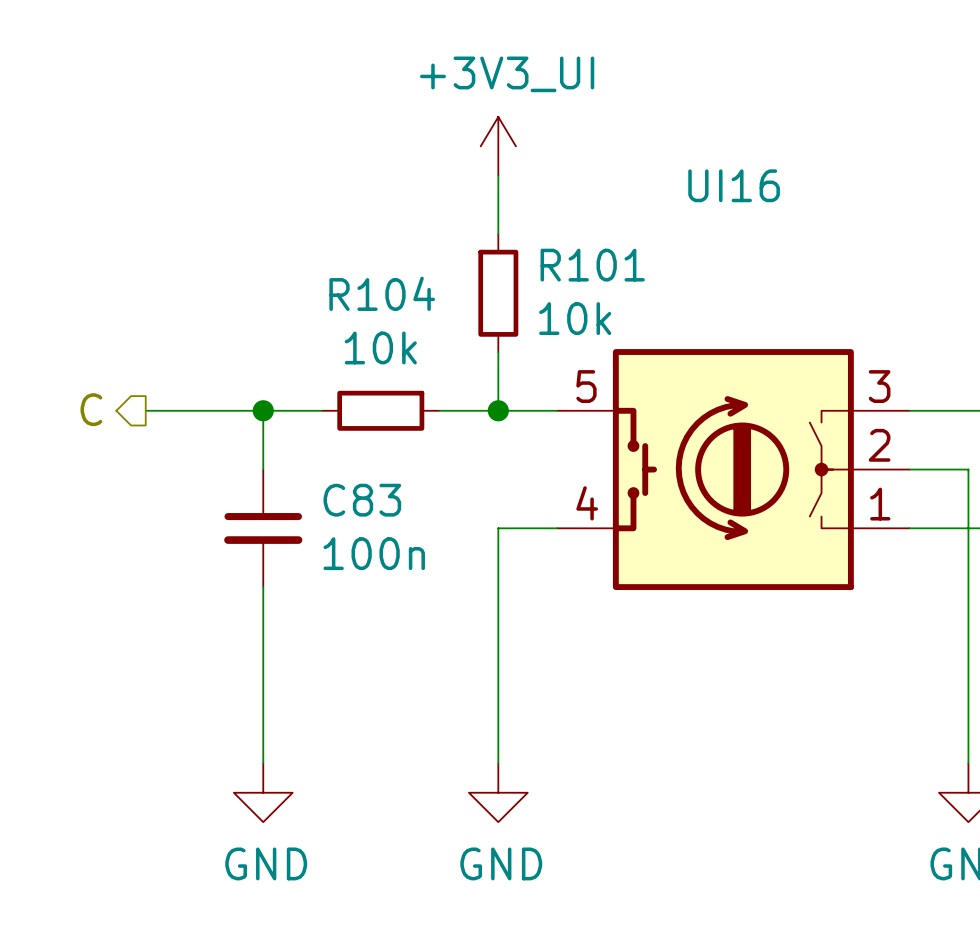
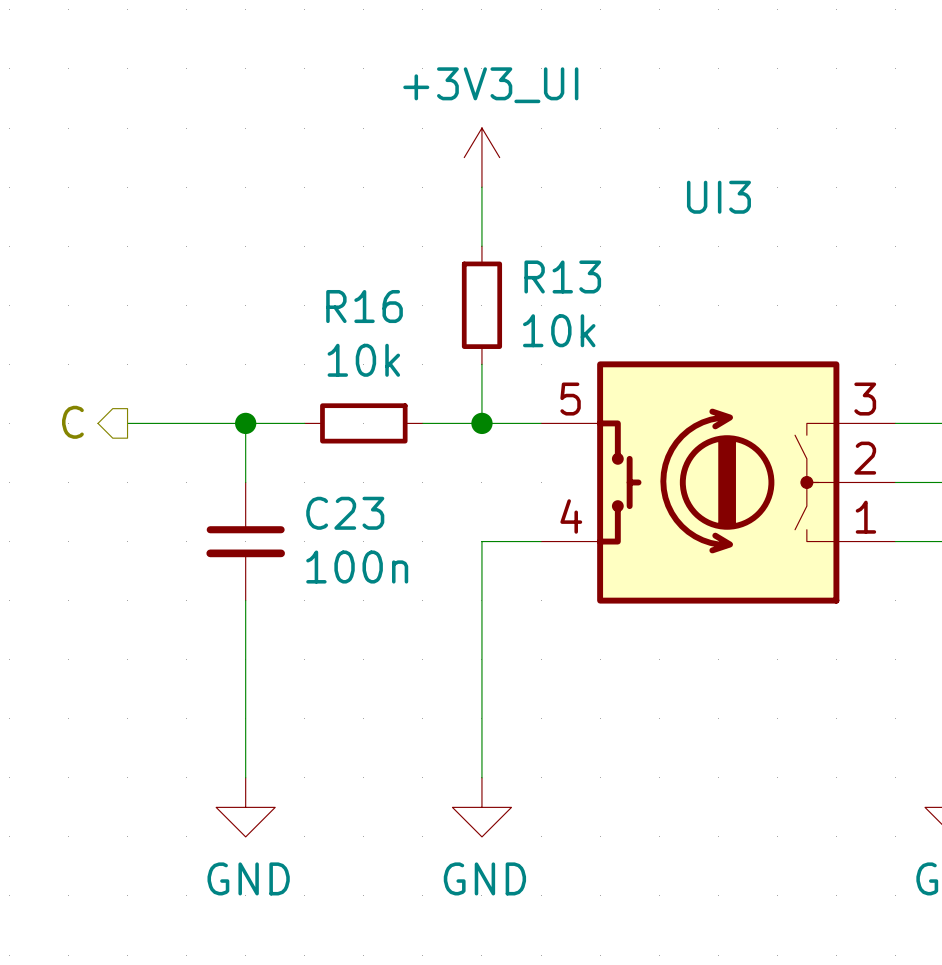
UI16 name: UI16 (734, 185) -> UI3 (718, 197)
R101 name: R101 (592, 265) -> R13 (562, 276)
R104 name: R104 (382, 293) -> R16 (364, 306)
C83 name: C83 (362, 500) -> C23 (345, 513)

